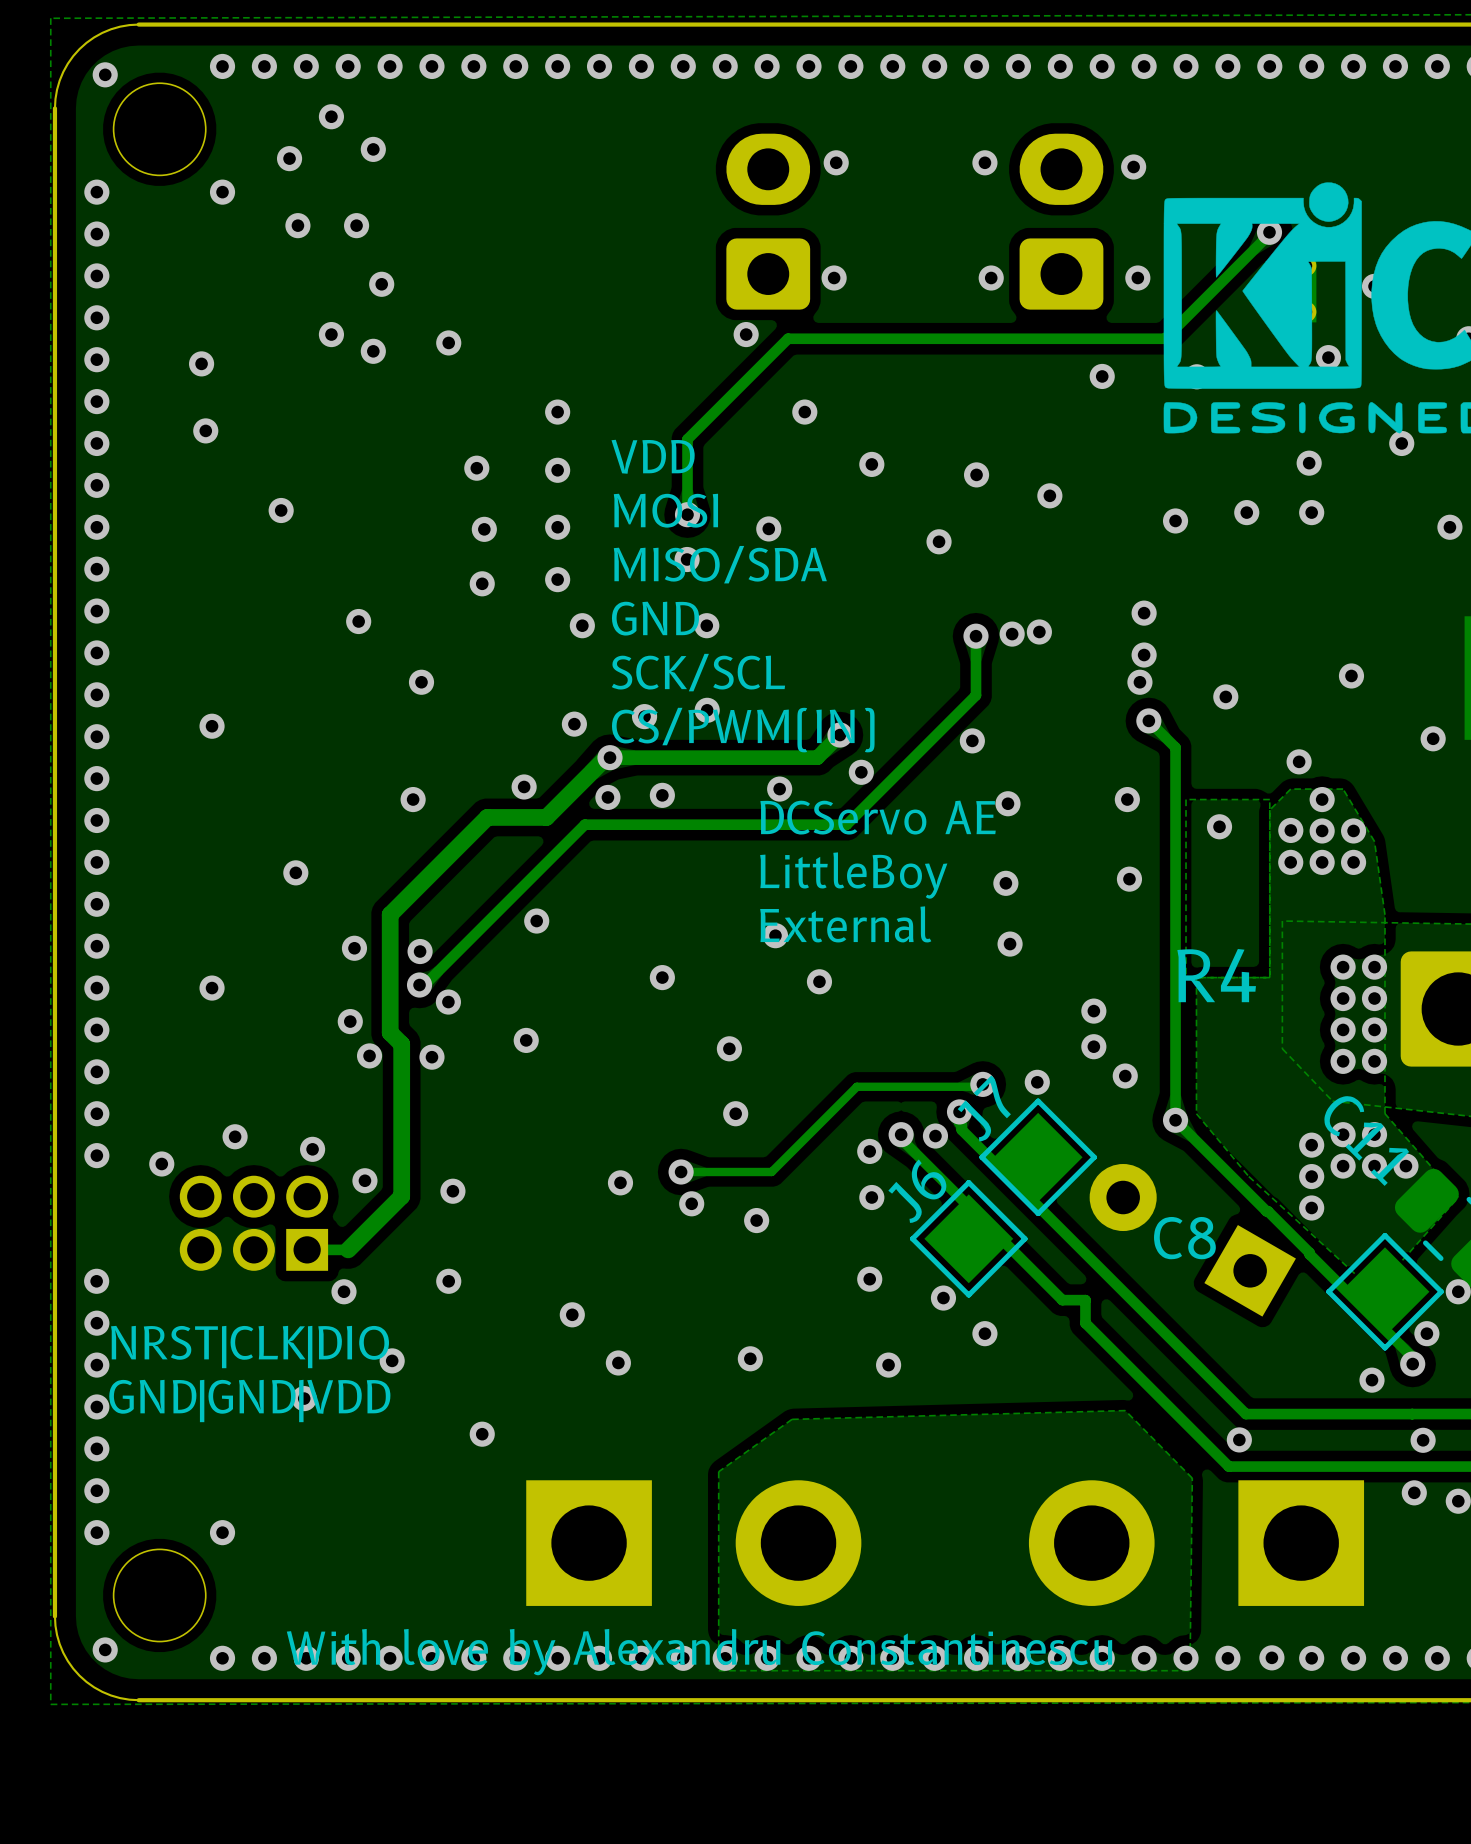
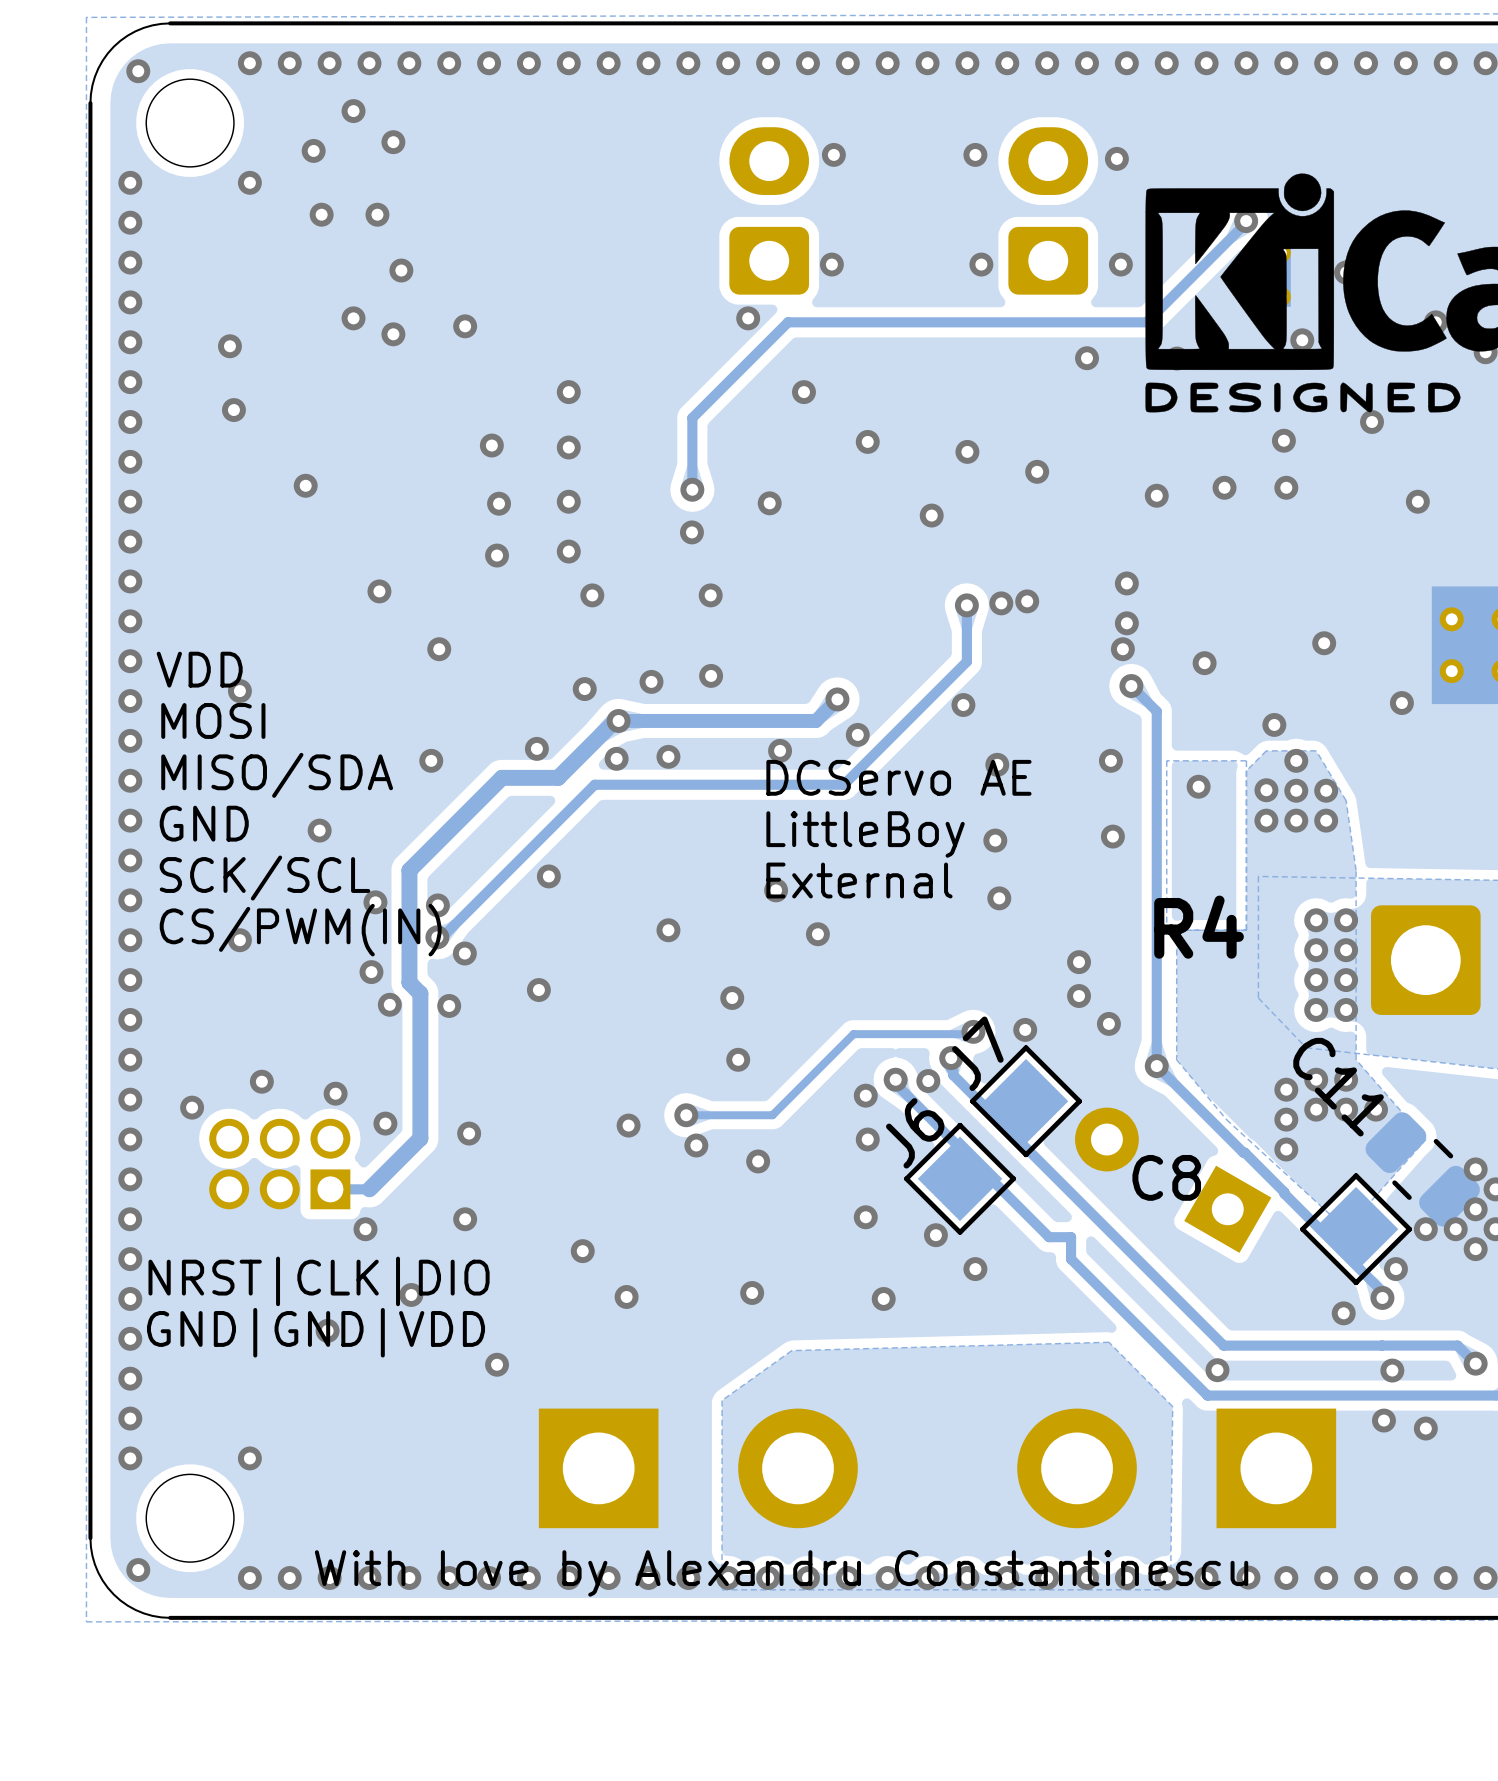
text position: VDD (653, 456) -> VDD (199, 669)
text position: MOSI (665, 510) -> MOSI (213, 720)
text position: MISO/SDA (720, 564) -> MISO/SDA (277, 775)
text position: GND (655, 618) -> GND (204, 823)
text position: SCK/SCL (698, 672) -> SCK/SCL (264, 878)
text position: CS/PWM(IN) (743, 730) -> CS/PWM(IN) (300, 930)
via: none -> (130, 1139)
via: none -> (130, 1179)

